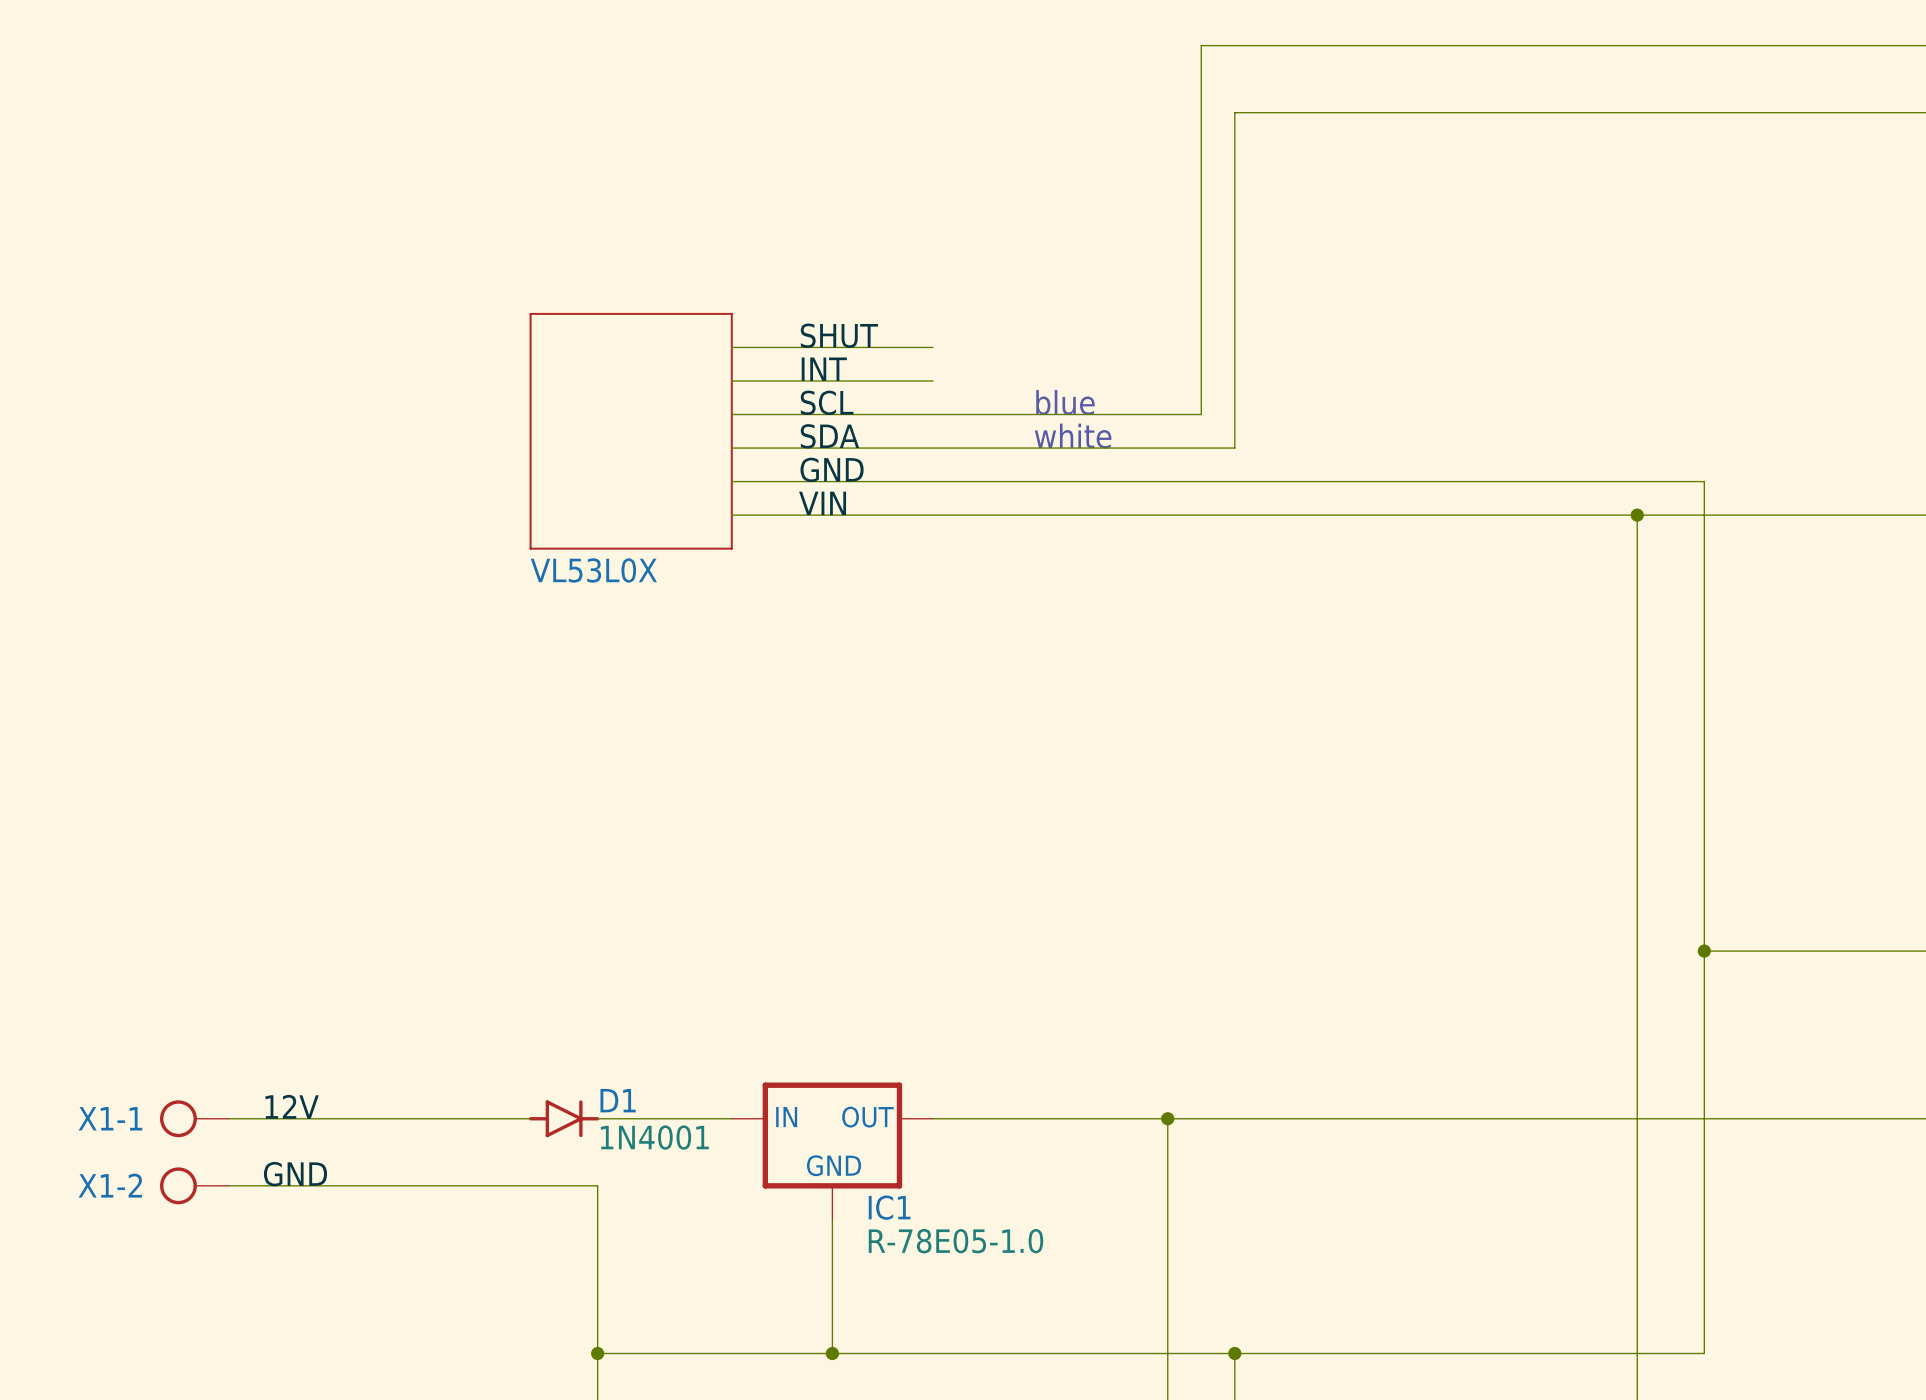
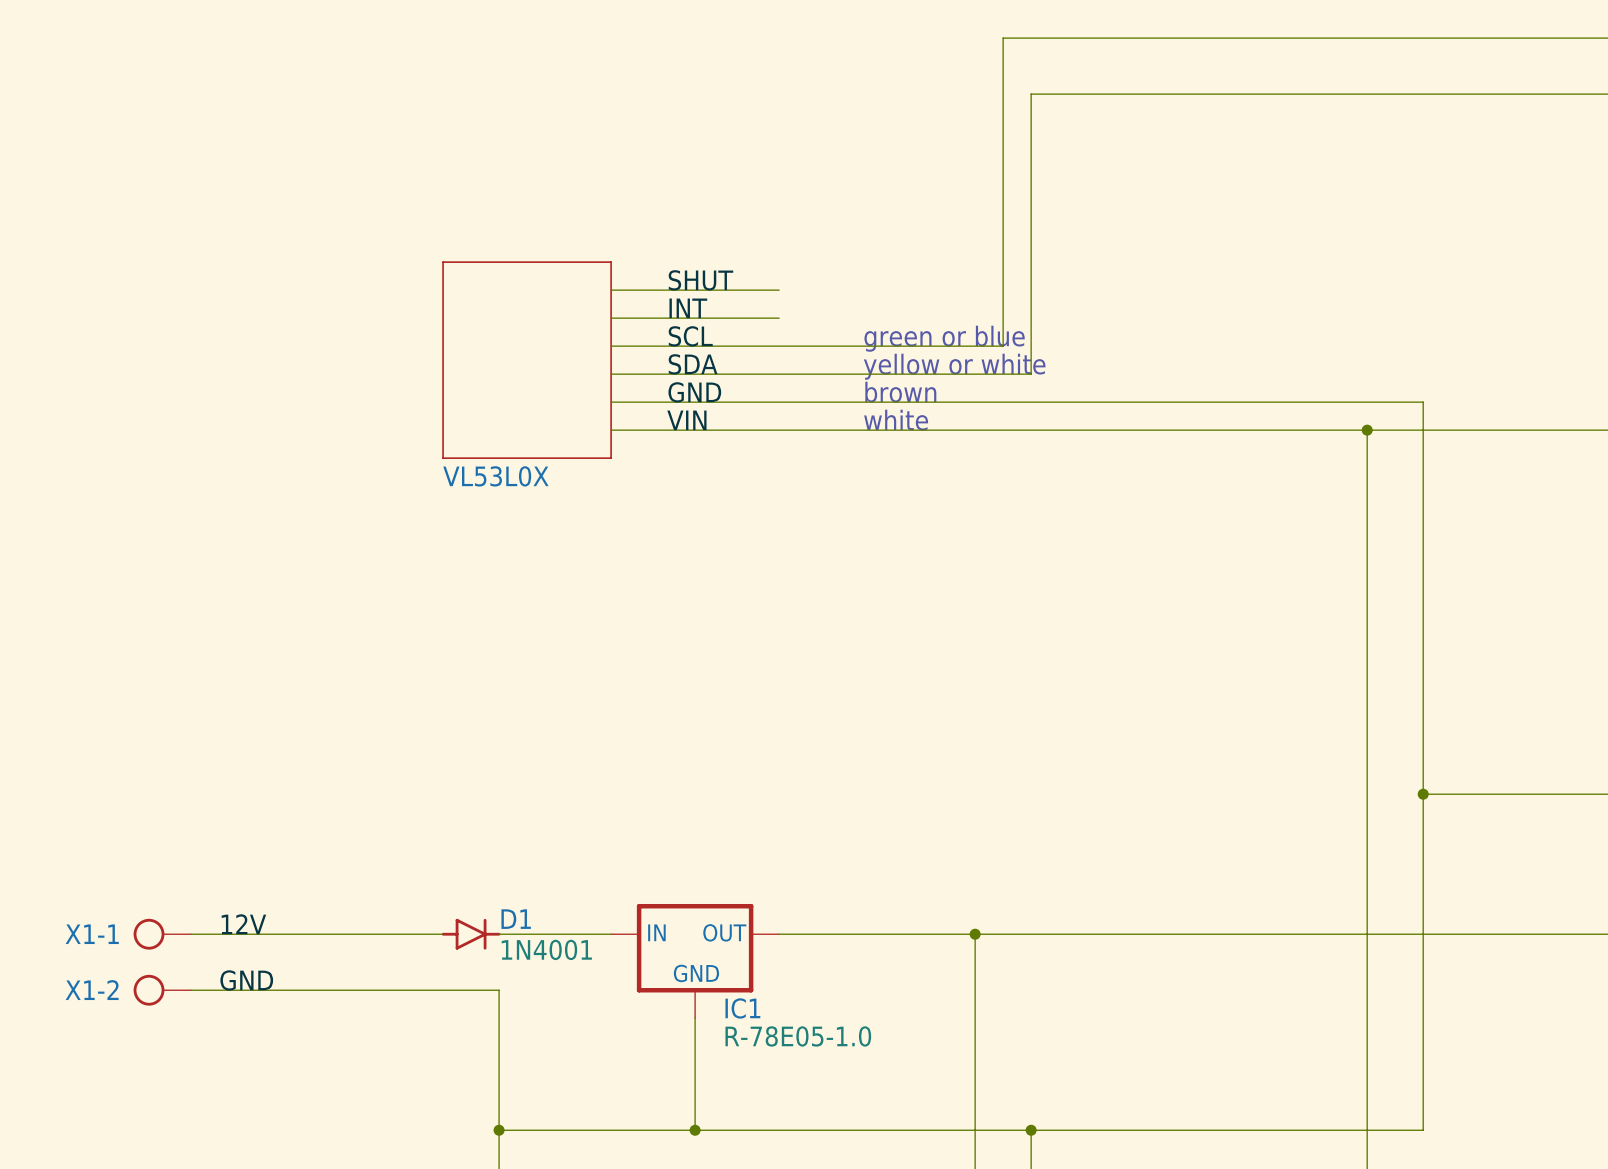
text: blue (1065, 402) -> green or blue (944, 338)
text: white (1073, 436) -> yellow or white (954, 366)
text: none -> brown (900, 392)
text: none -> white (896, 420)

